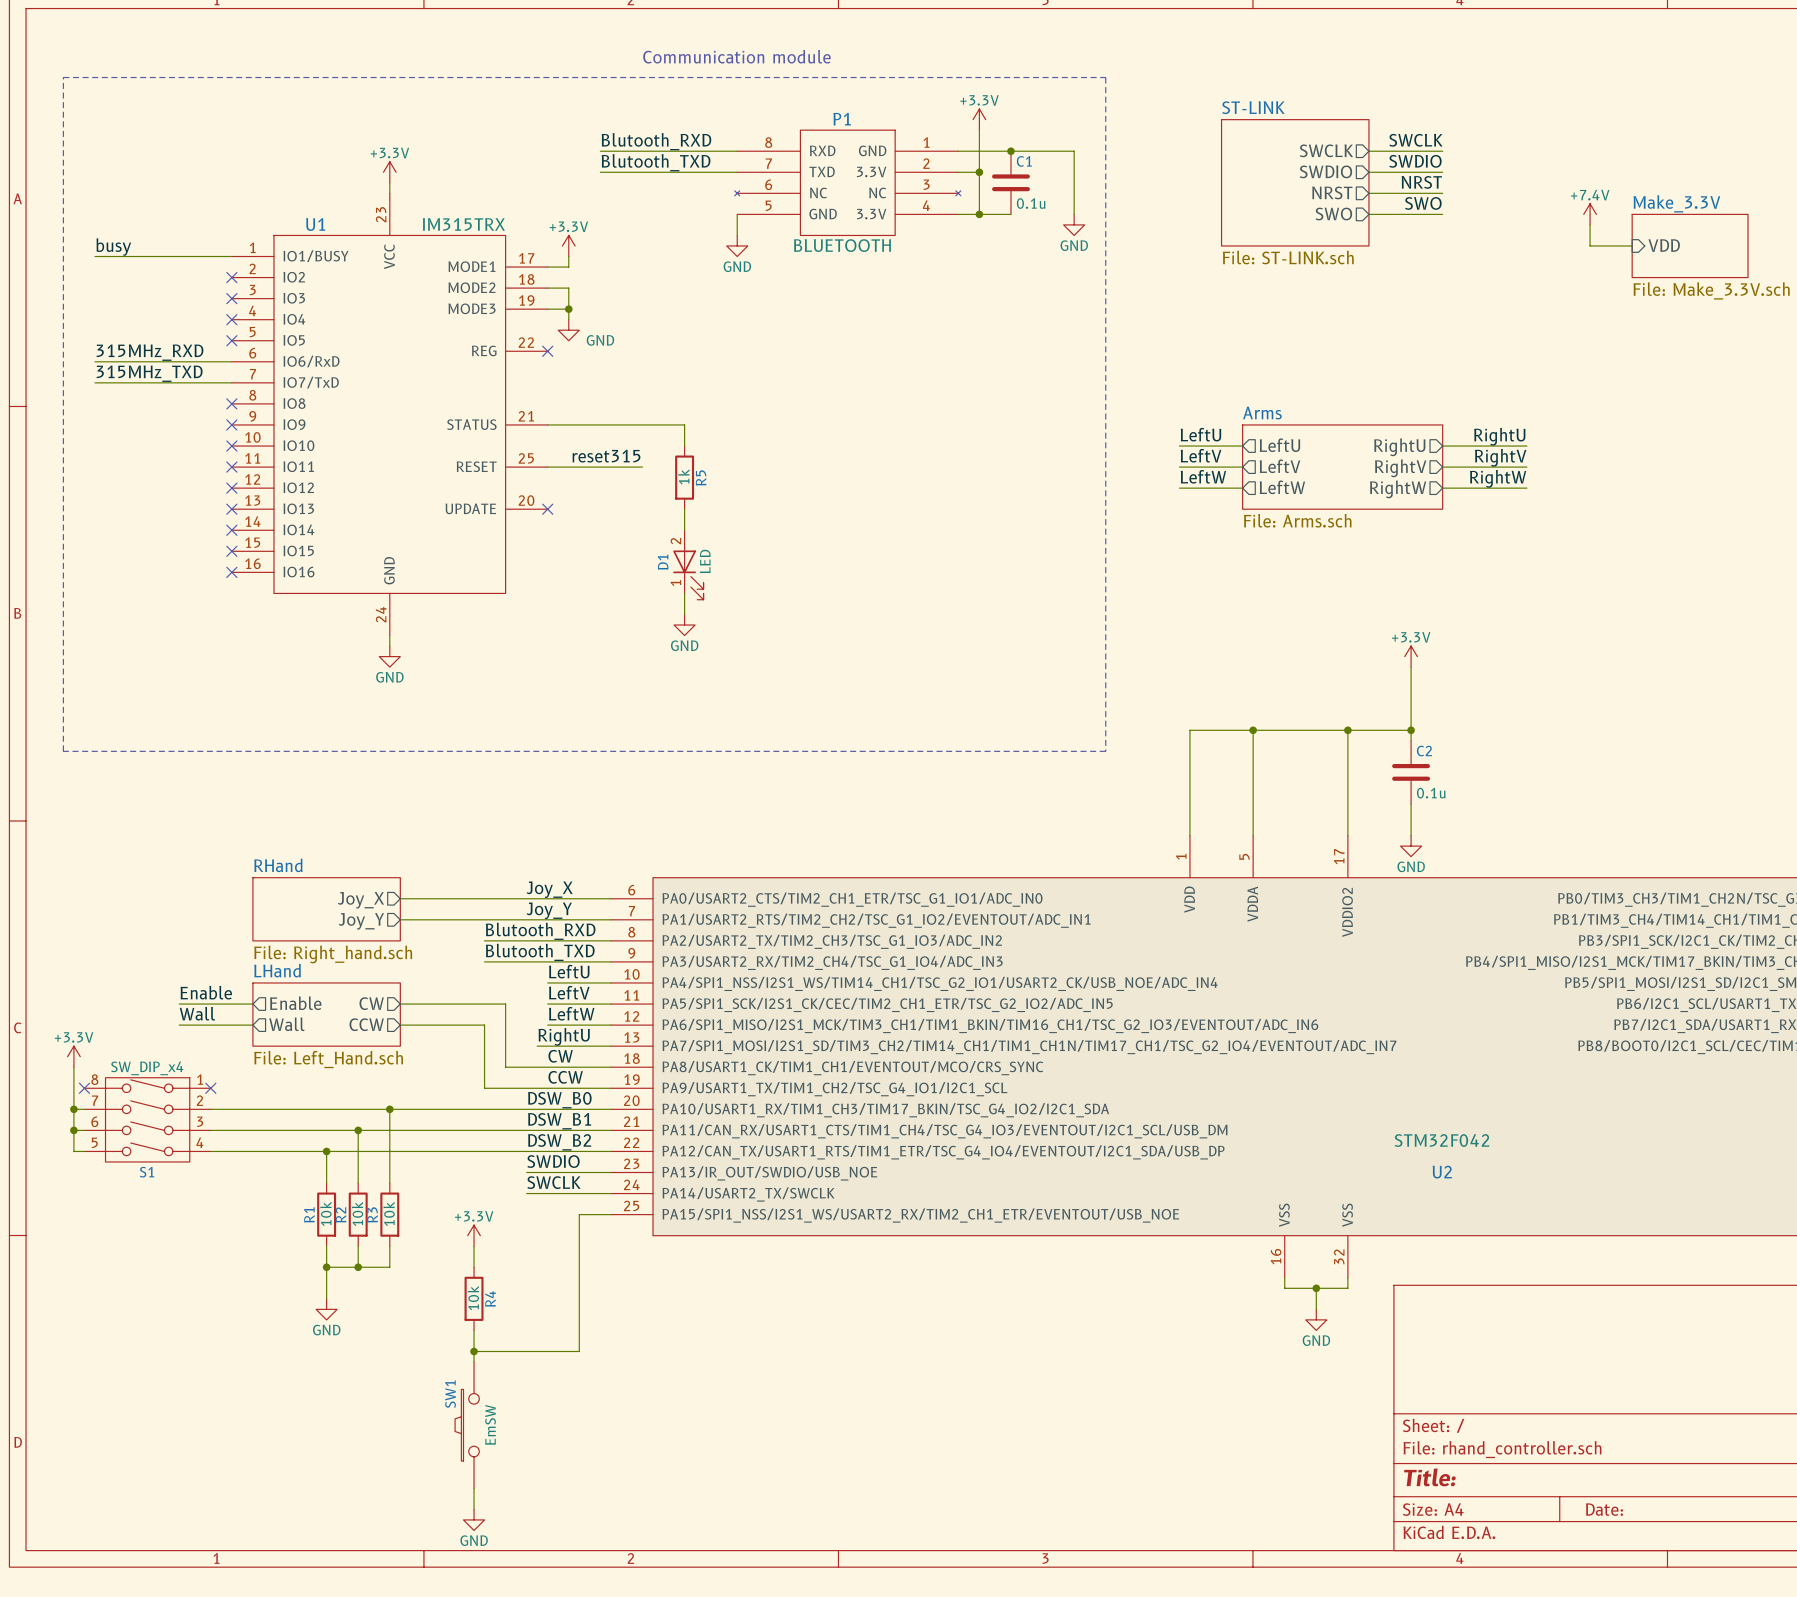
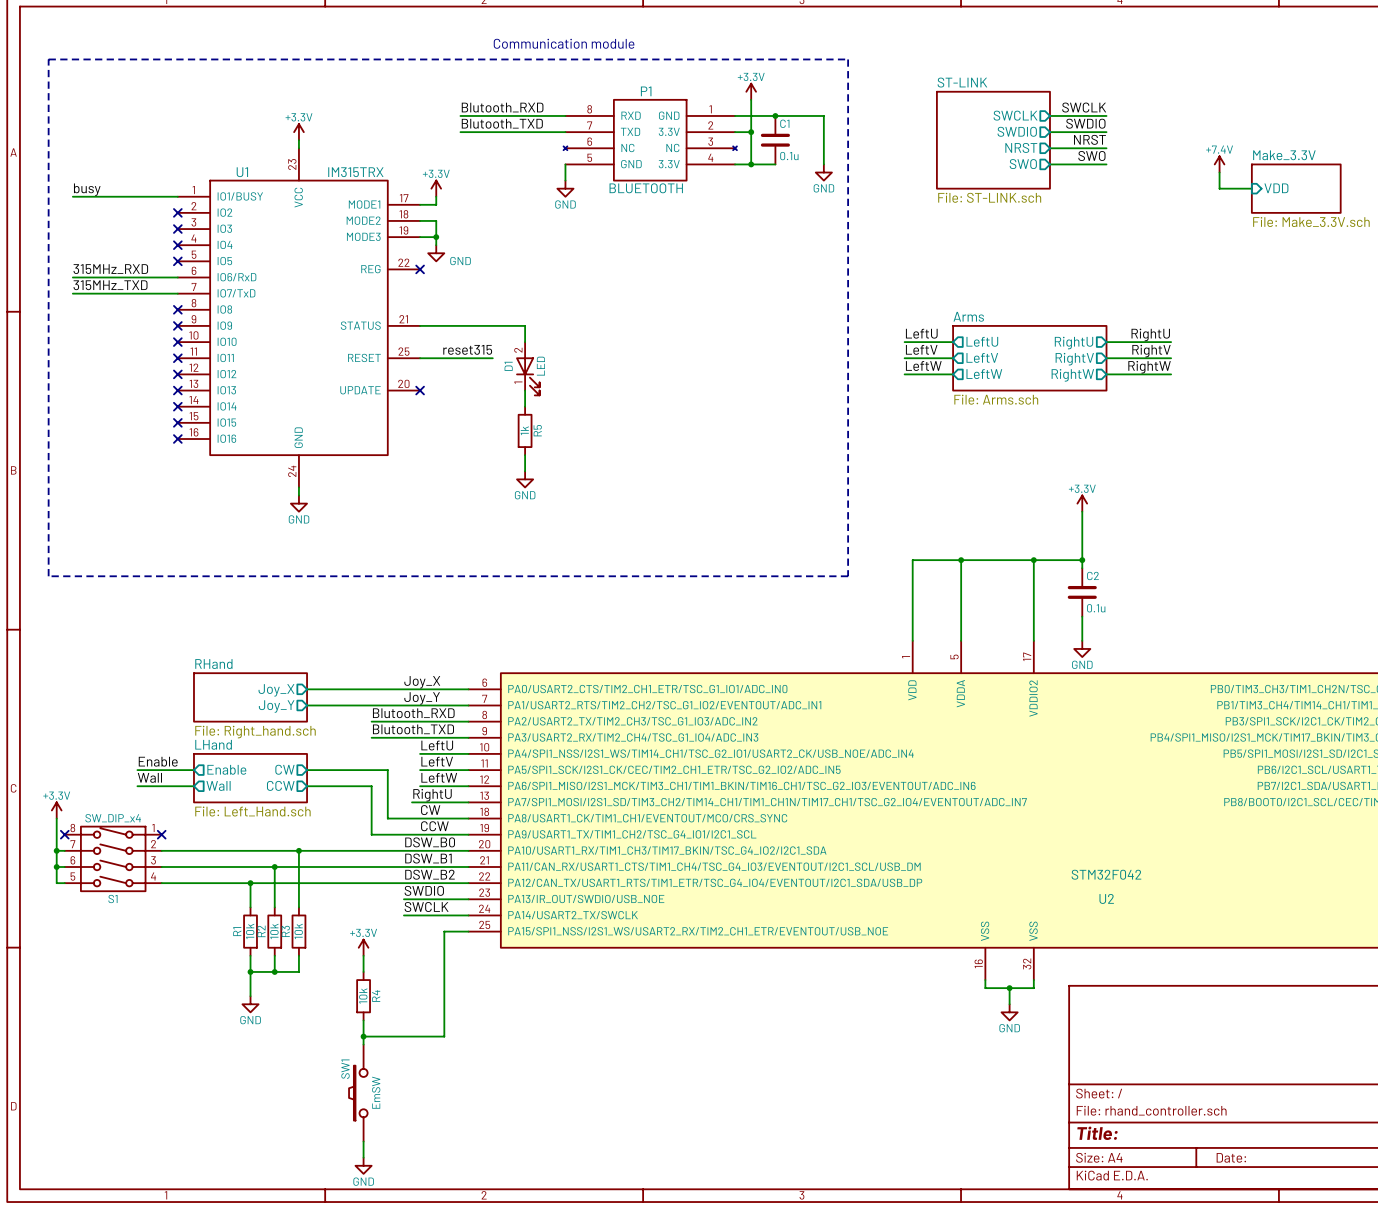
R5 position: (684, 477) -> (525, 430)
D1 position: (688, 565) -> (527, 368)

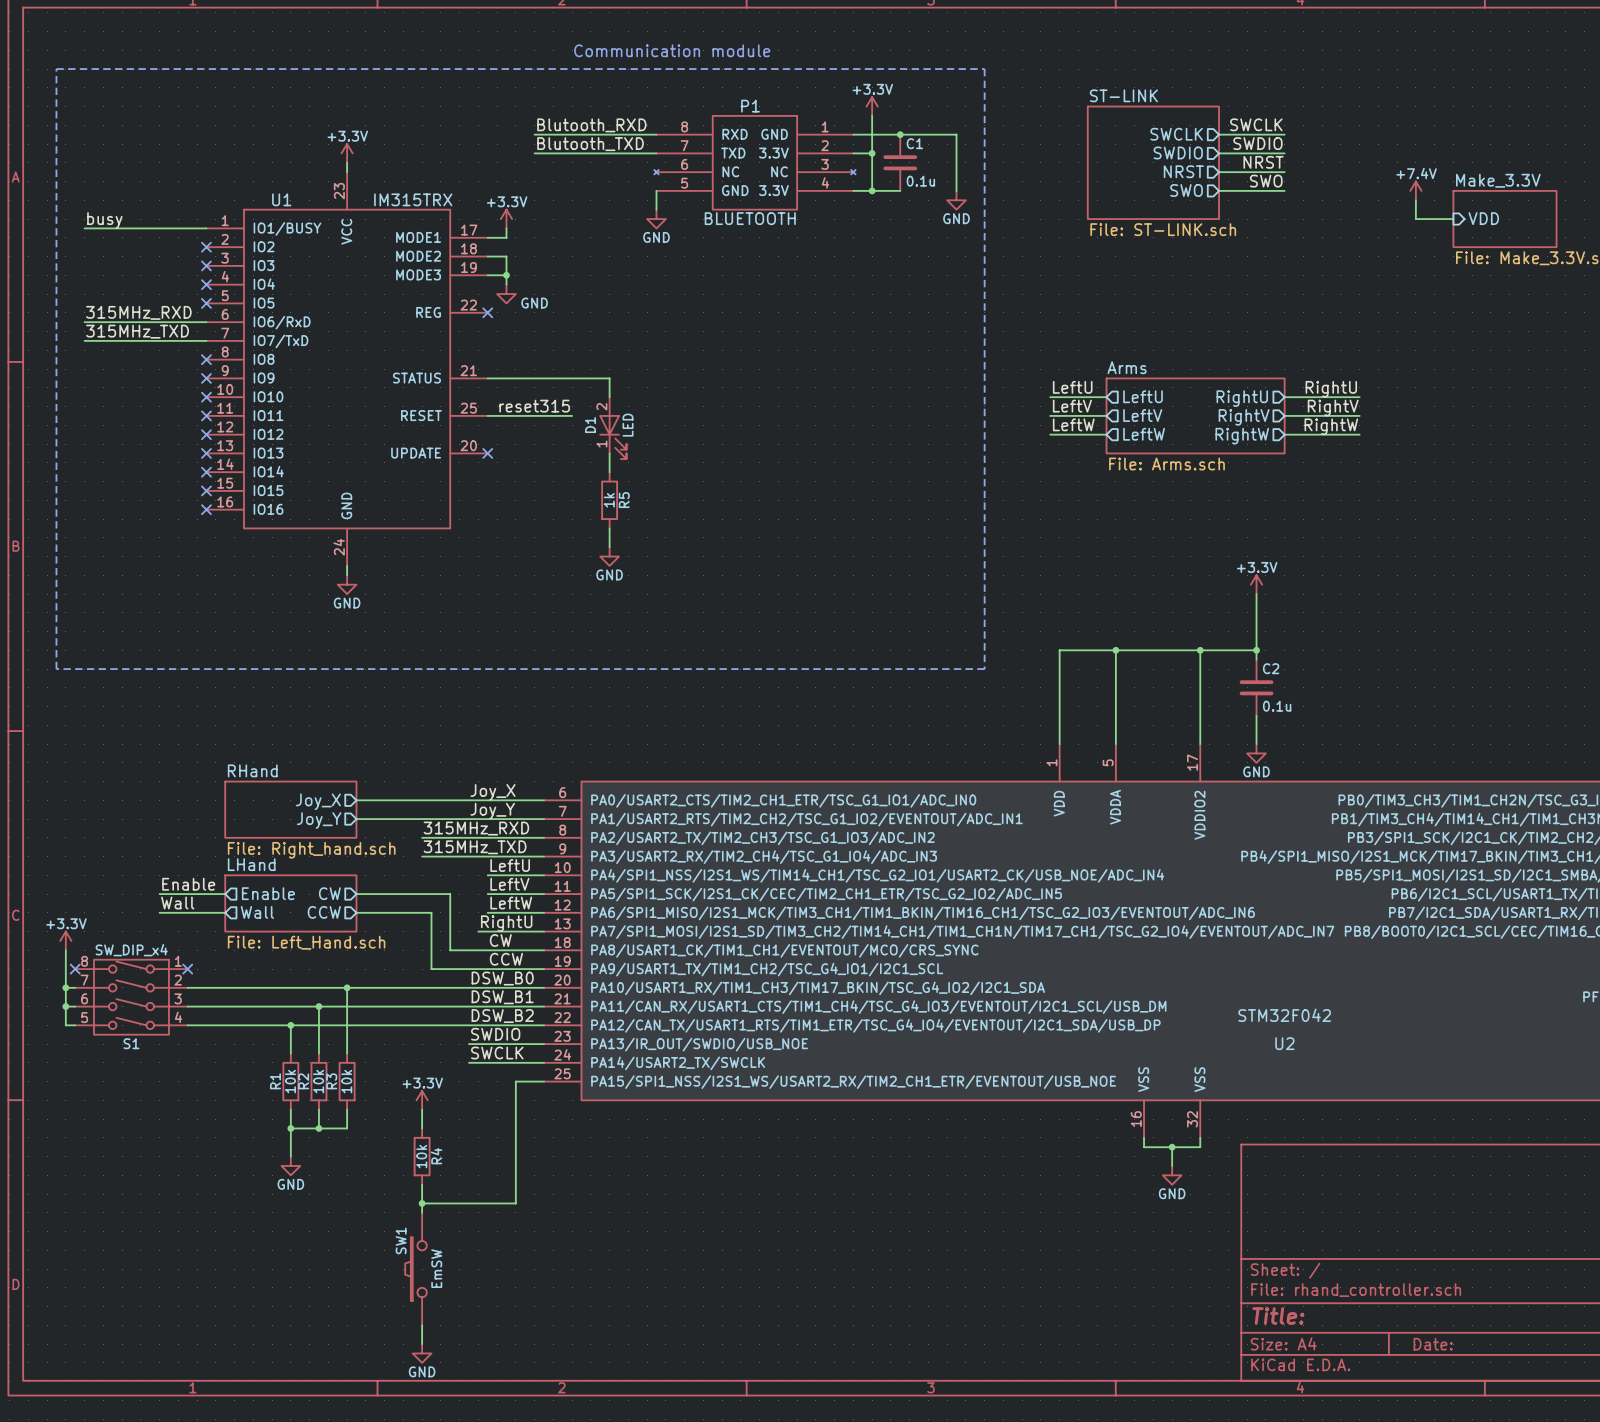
label: none -> 315MHz_RXD (476, 828)
label: Blutooth_RXD (413, 713) -> none
wire: none -> (422, 837) (431, 837)
label: none -> 315MHz_TXD (475, 847)
label: Blutooth_TXD (413, 729) -> none
wire: none -> (422, 856) (431, 856)

